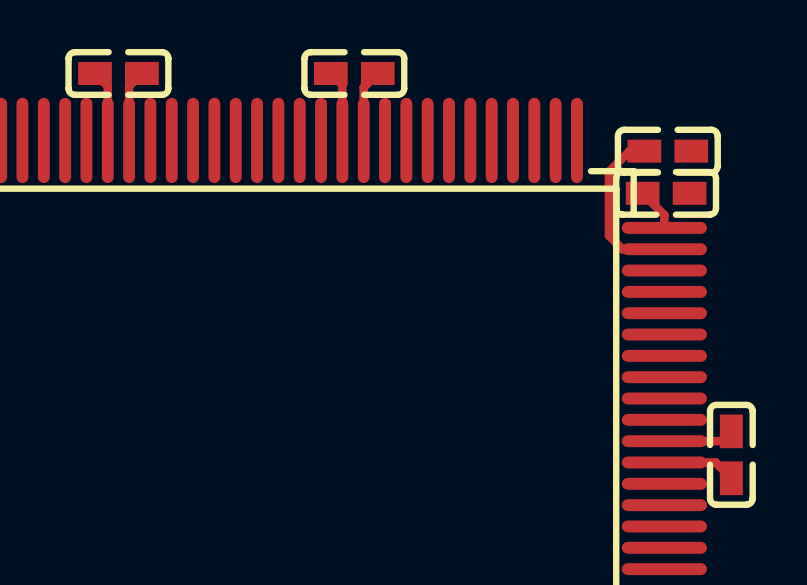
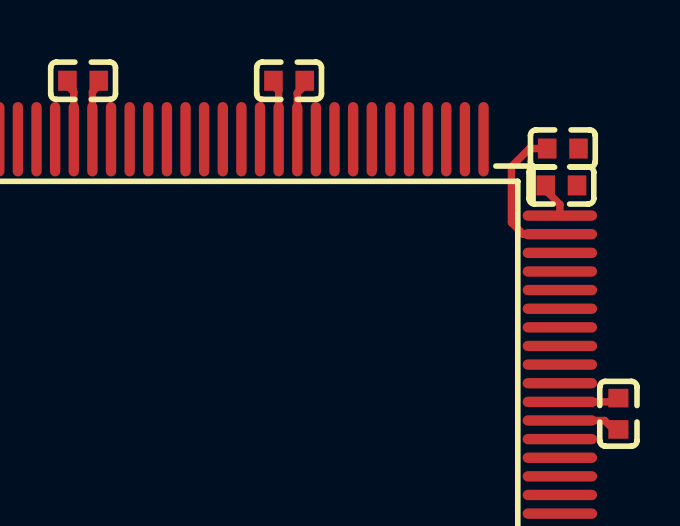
part footprint: [65, 48, 172, 99] -> [47, 59, 119, 103]
part footprint: [301, 48, 408, 99] -> [253, 59, 325, 103]
part footprint: [614, 126, 721, 176] -> [527, 127, 599, 170]
part footprint: [613, 168, 720, 218] -> [526, 164, 597, 207]
part footprint: [706, 401, 756, 508] -> [596, 378, 640, 449]

